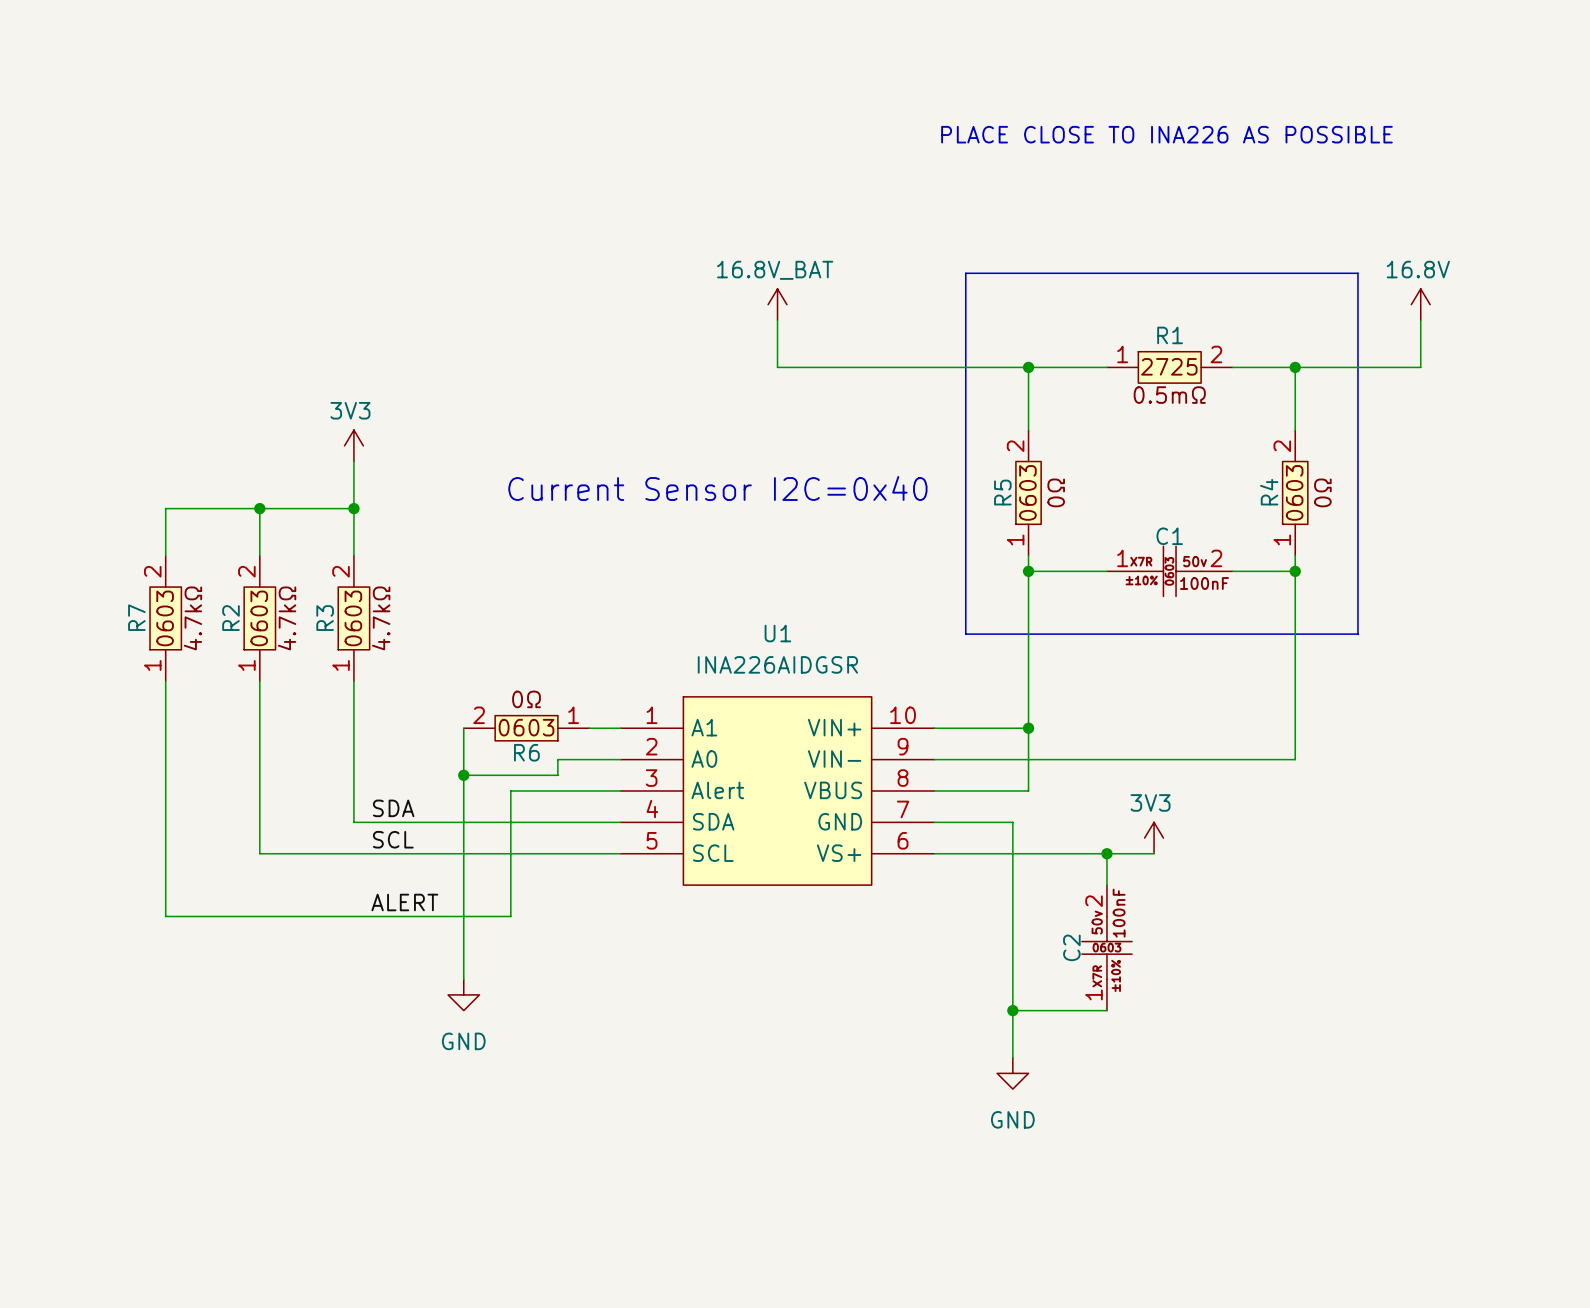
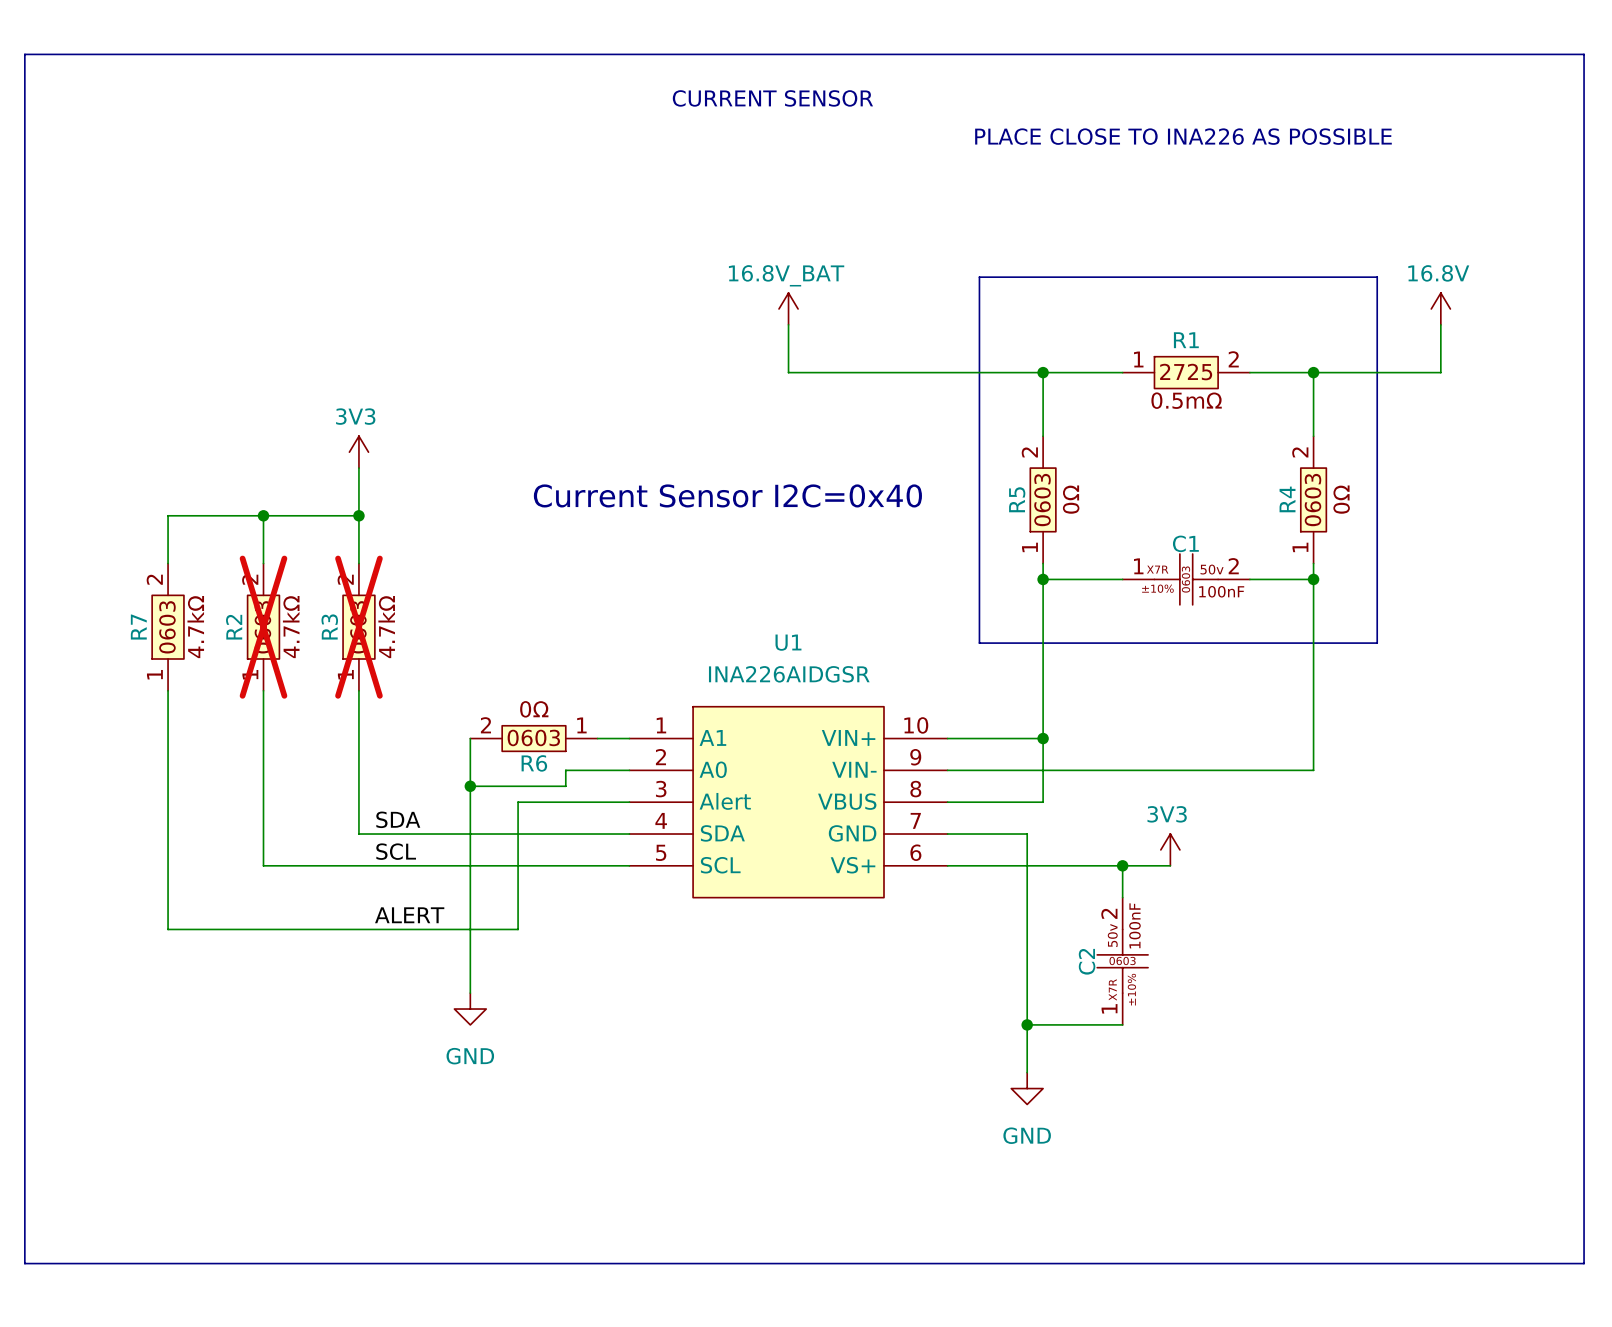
line: none -> (24, 54) (1584, 54) (1584, 1263) (24, 1263) (24, 54)
text: none -> CURRENT SENSOR (772, 98)
R2 do-not-place cross: none -> (263, 627)
R3 do-not-place cross: none -> (358, 627)

